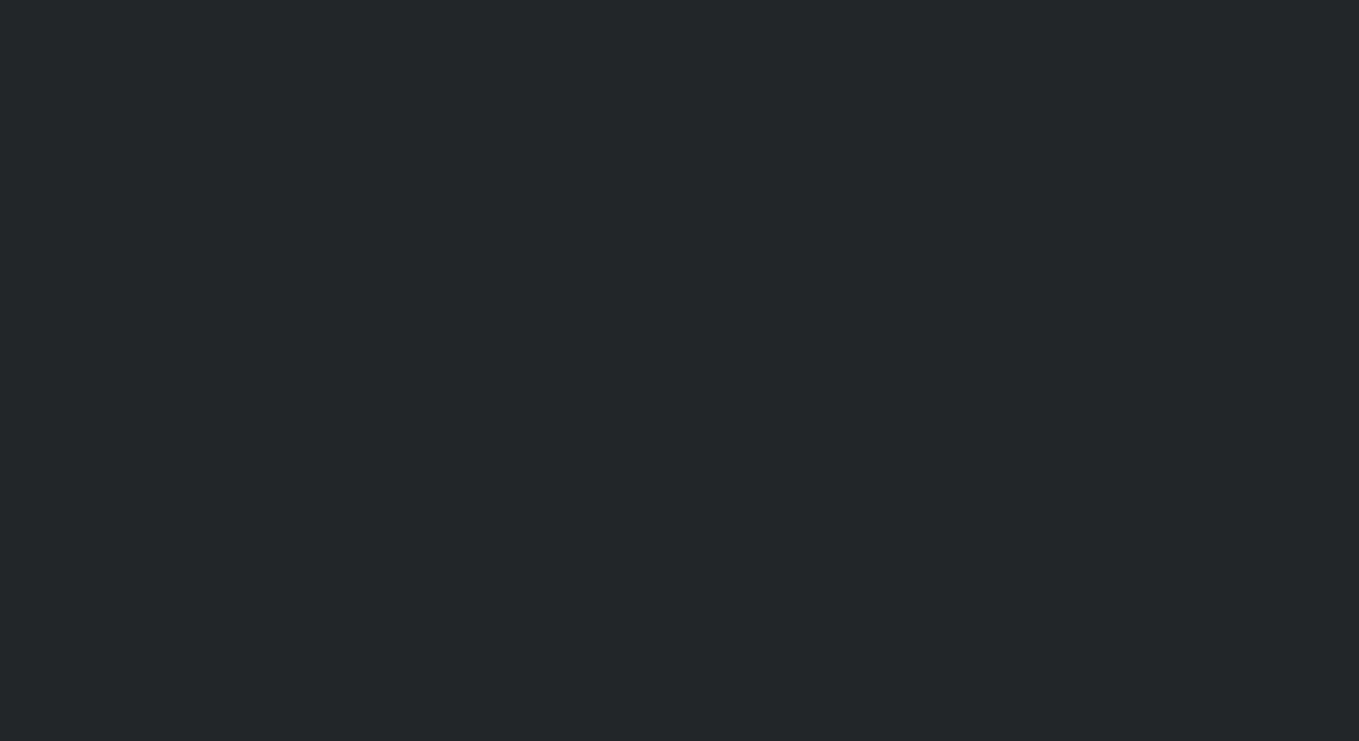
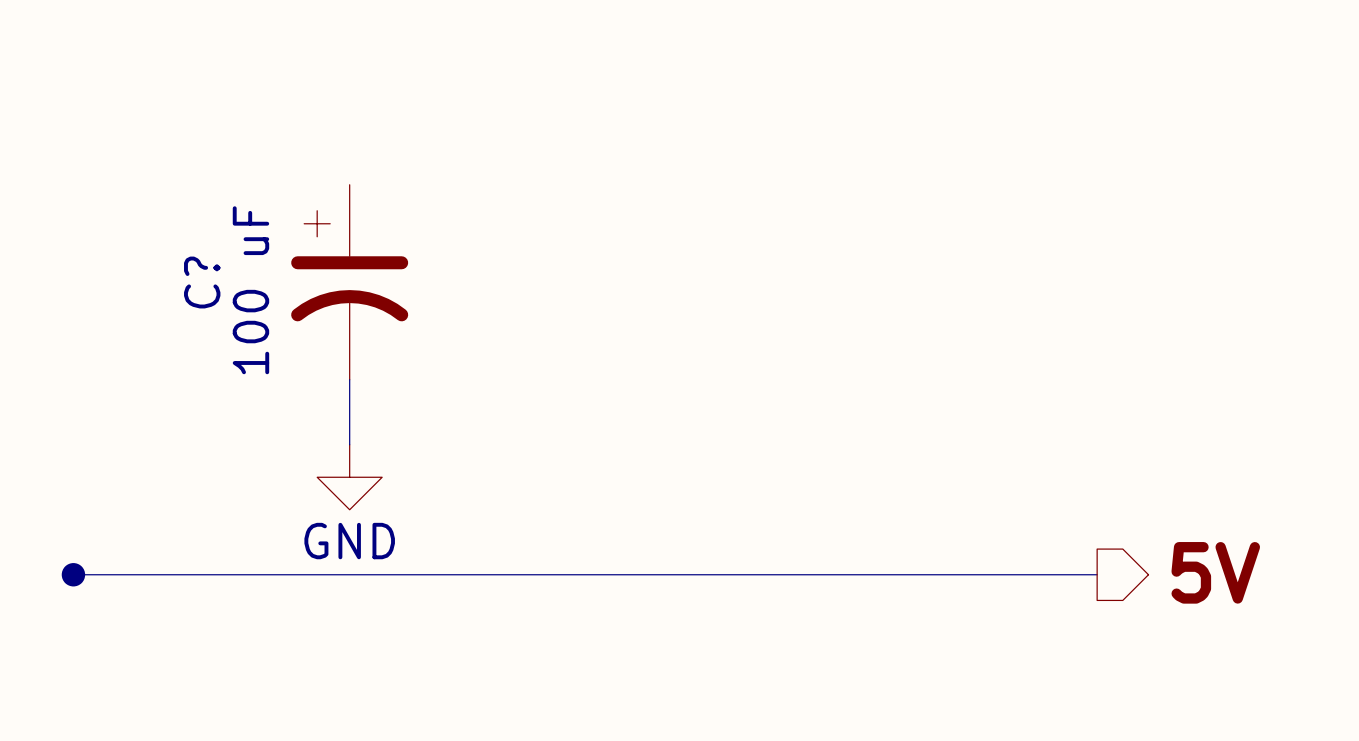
C?: none -> 100 uF (349, 282)
wire: none -> (349, 379) (349, 444)
power symbol: none -> GND (349, 477)
hierarchical label: none -> 5V (1215, 572)
wire: none -> (73, 574) (1097, 574)
junction: none -> (73, 574)

